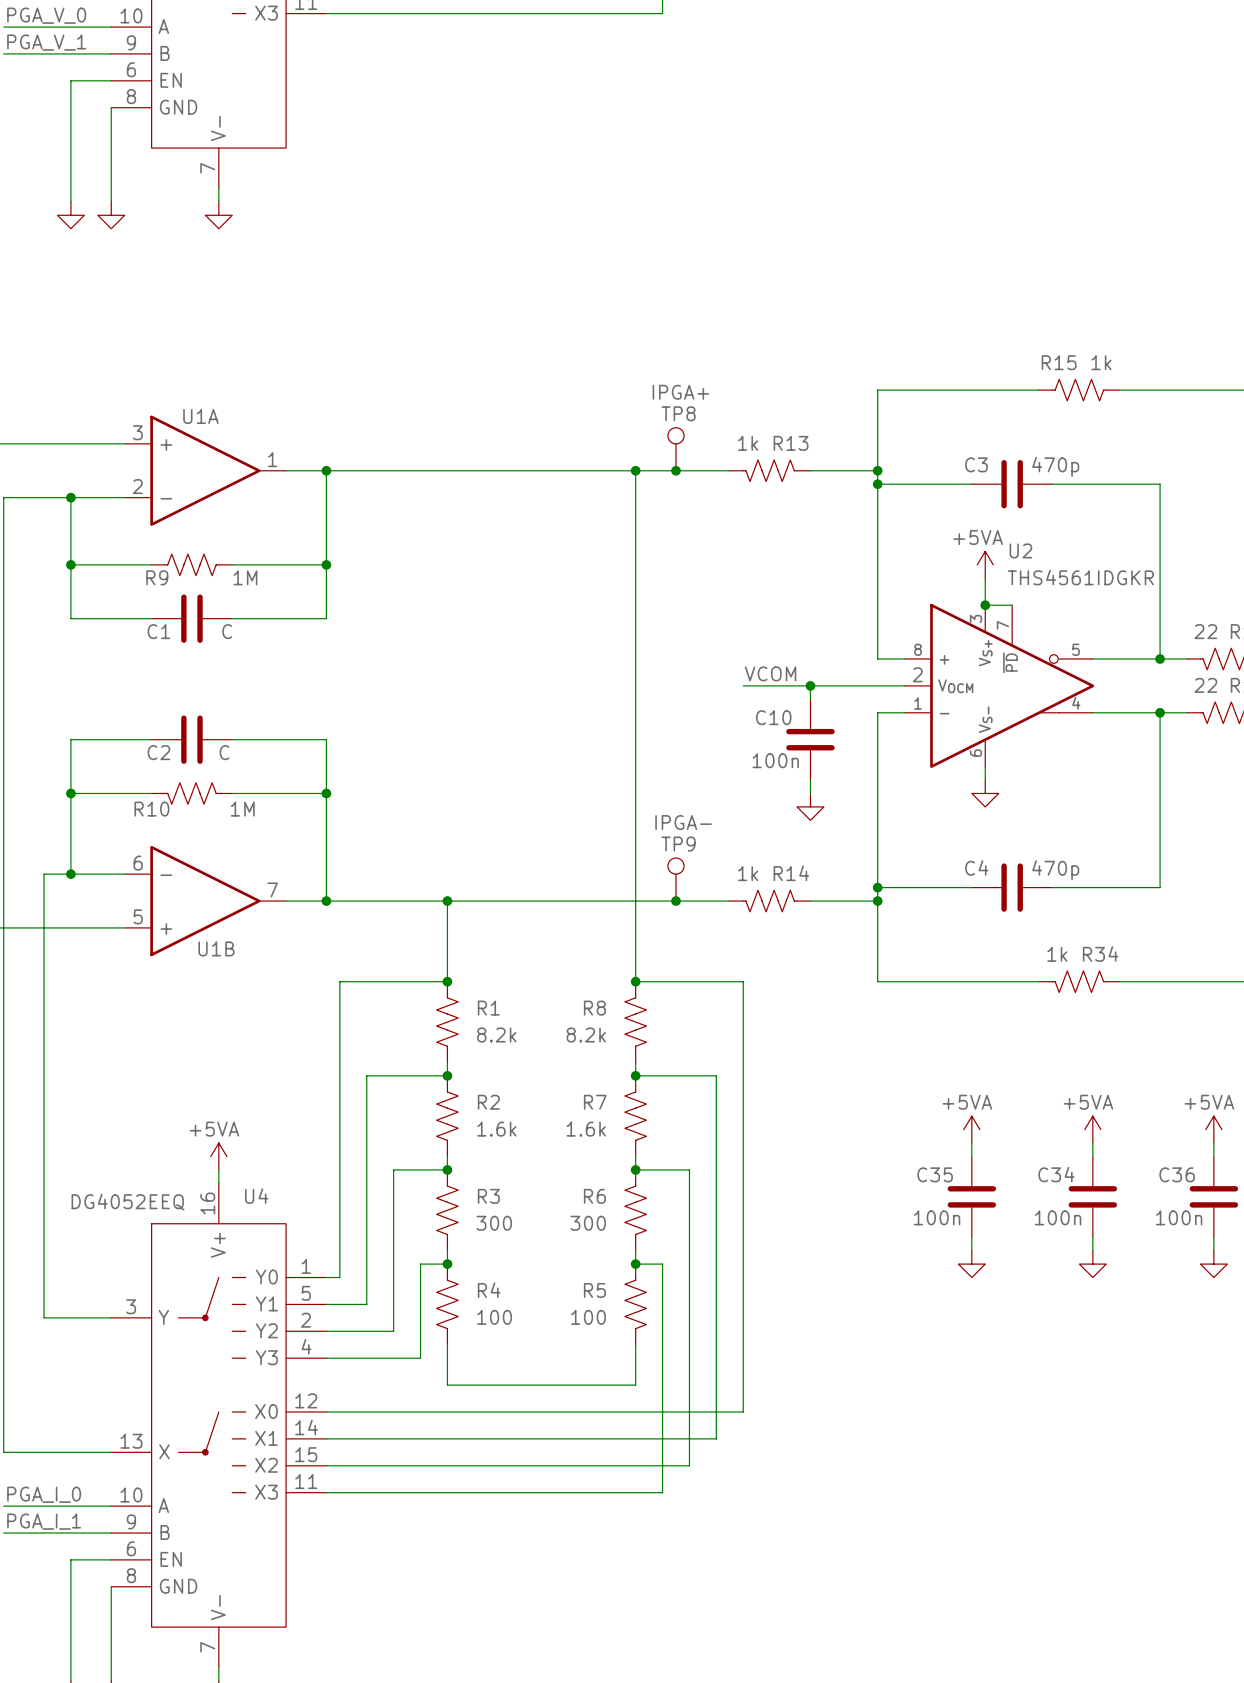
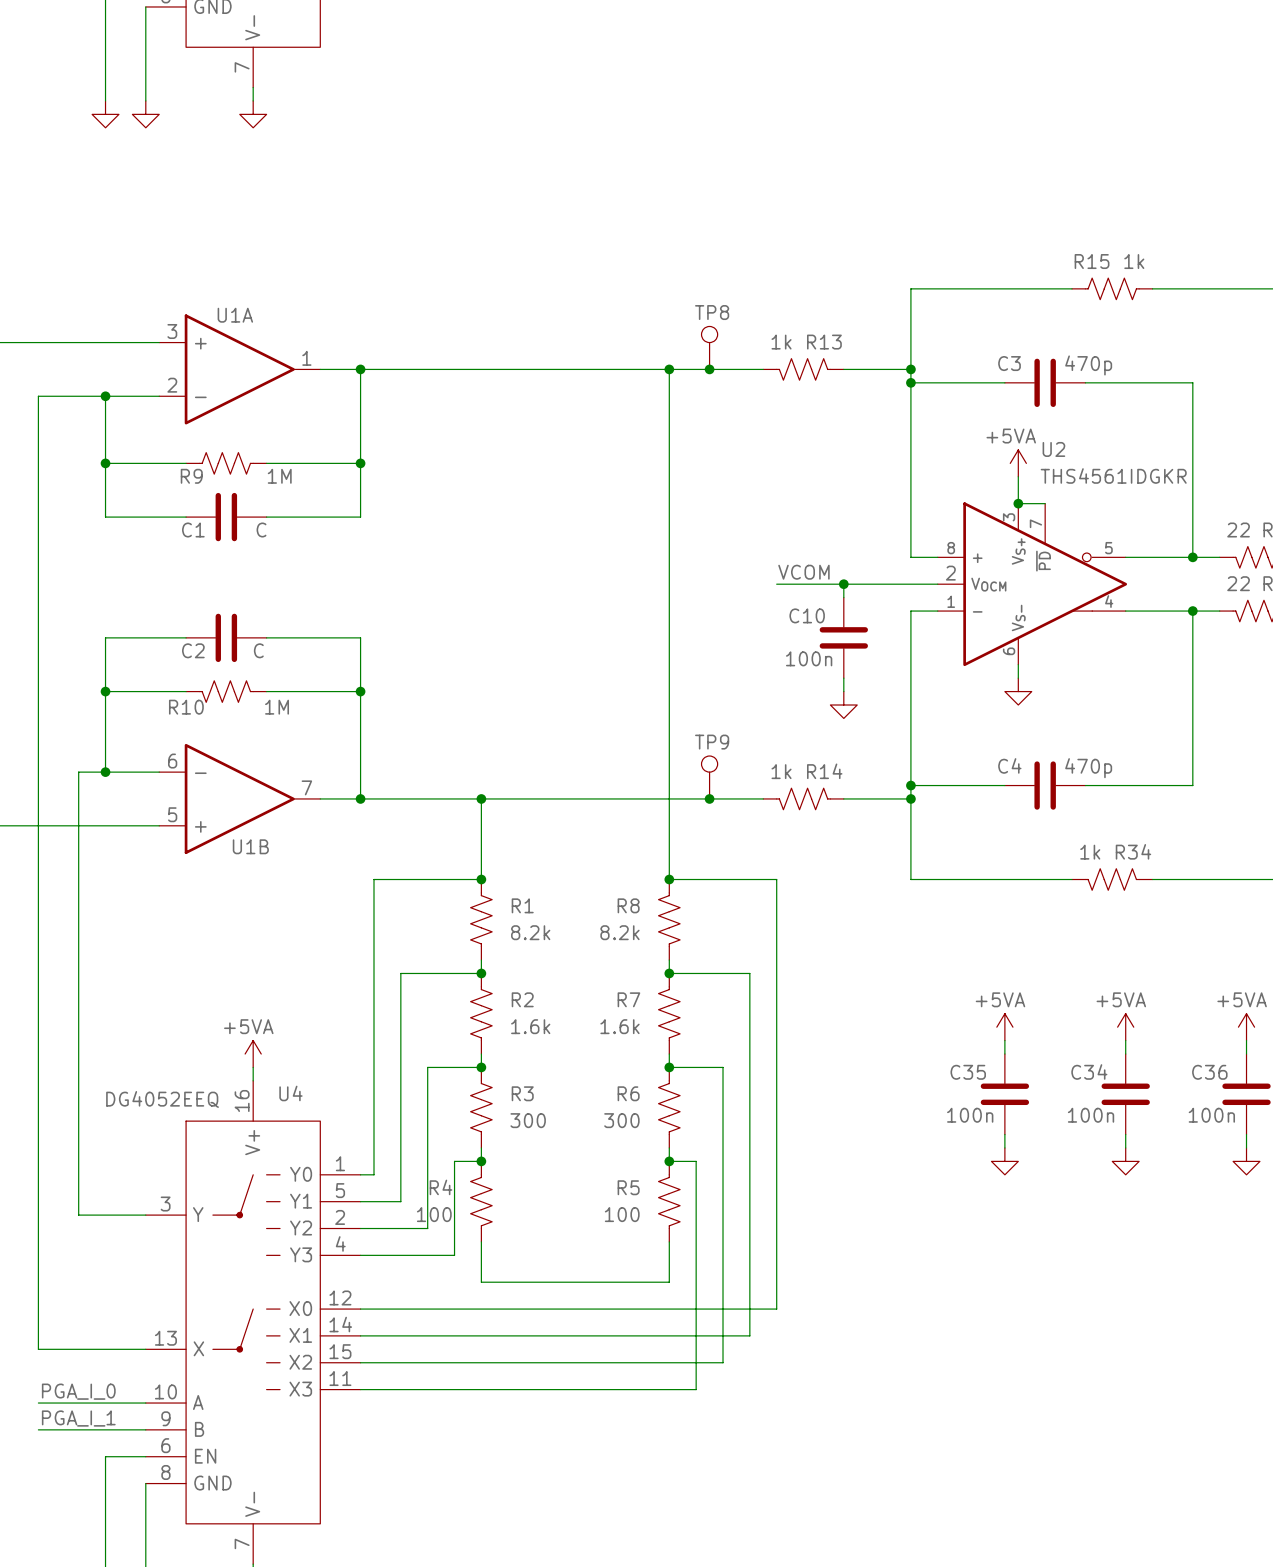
TP8 value: IPGA+ (680, 392) -> none
TP9 value: IPGA- (683, 822) -> none
R4 flip: as is (447, 1304) -> left-right (481, 1201)

